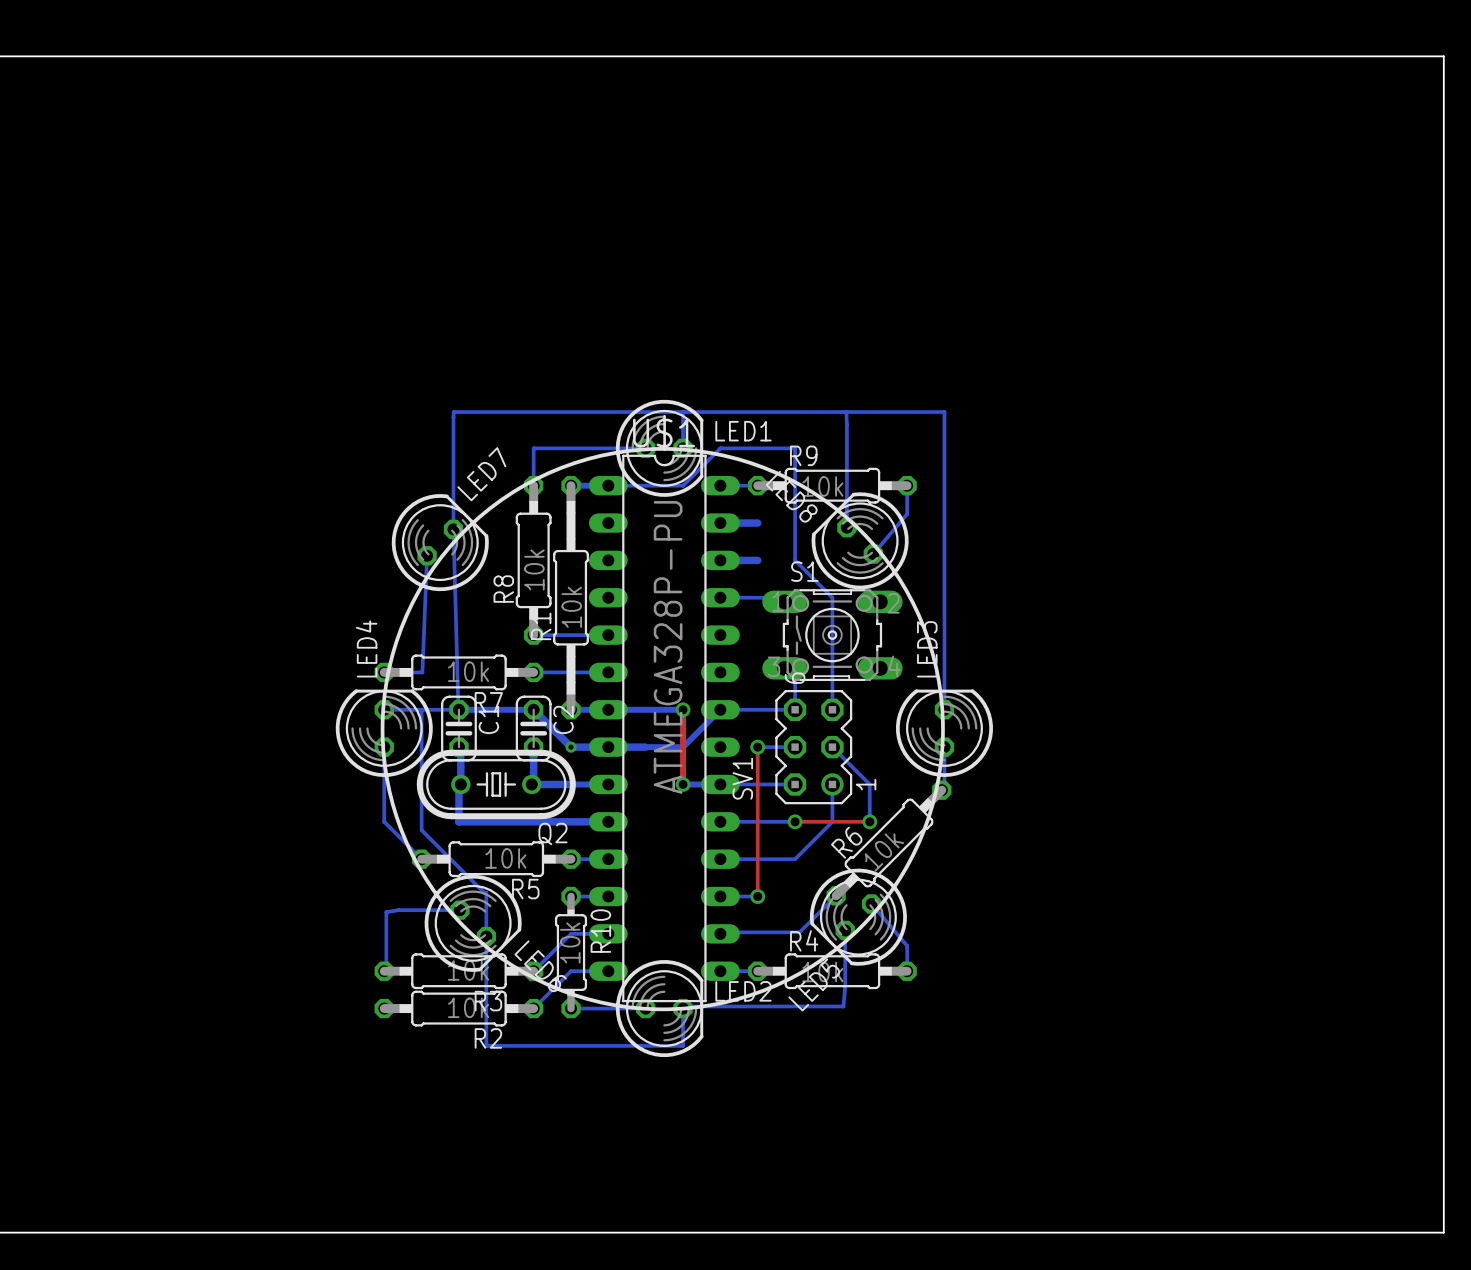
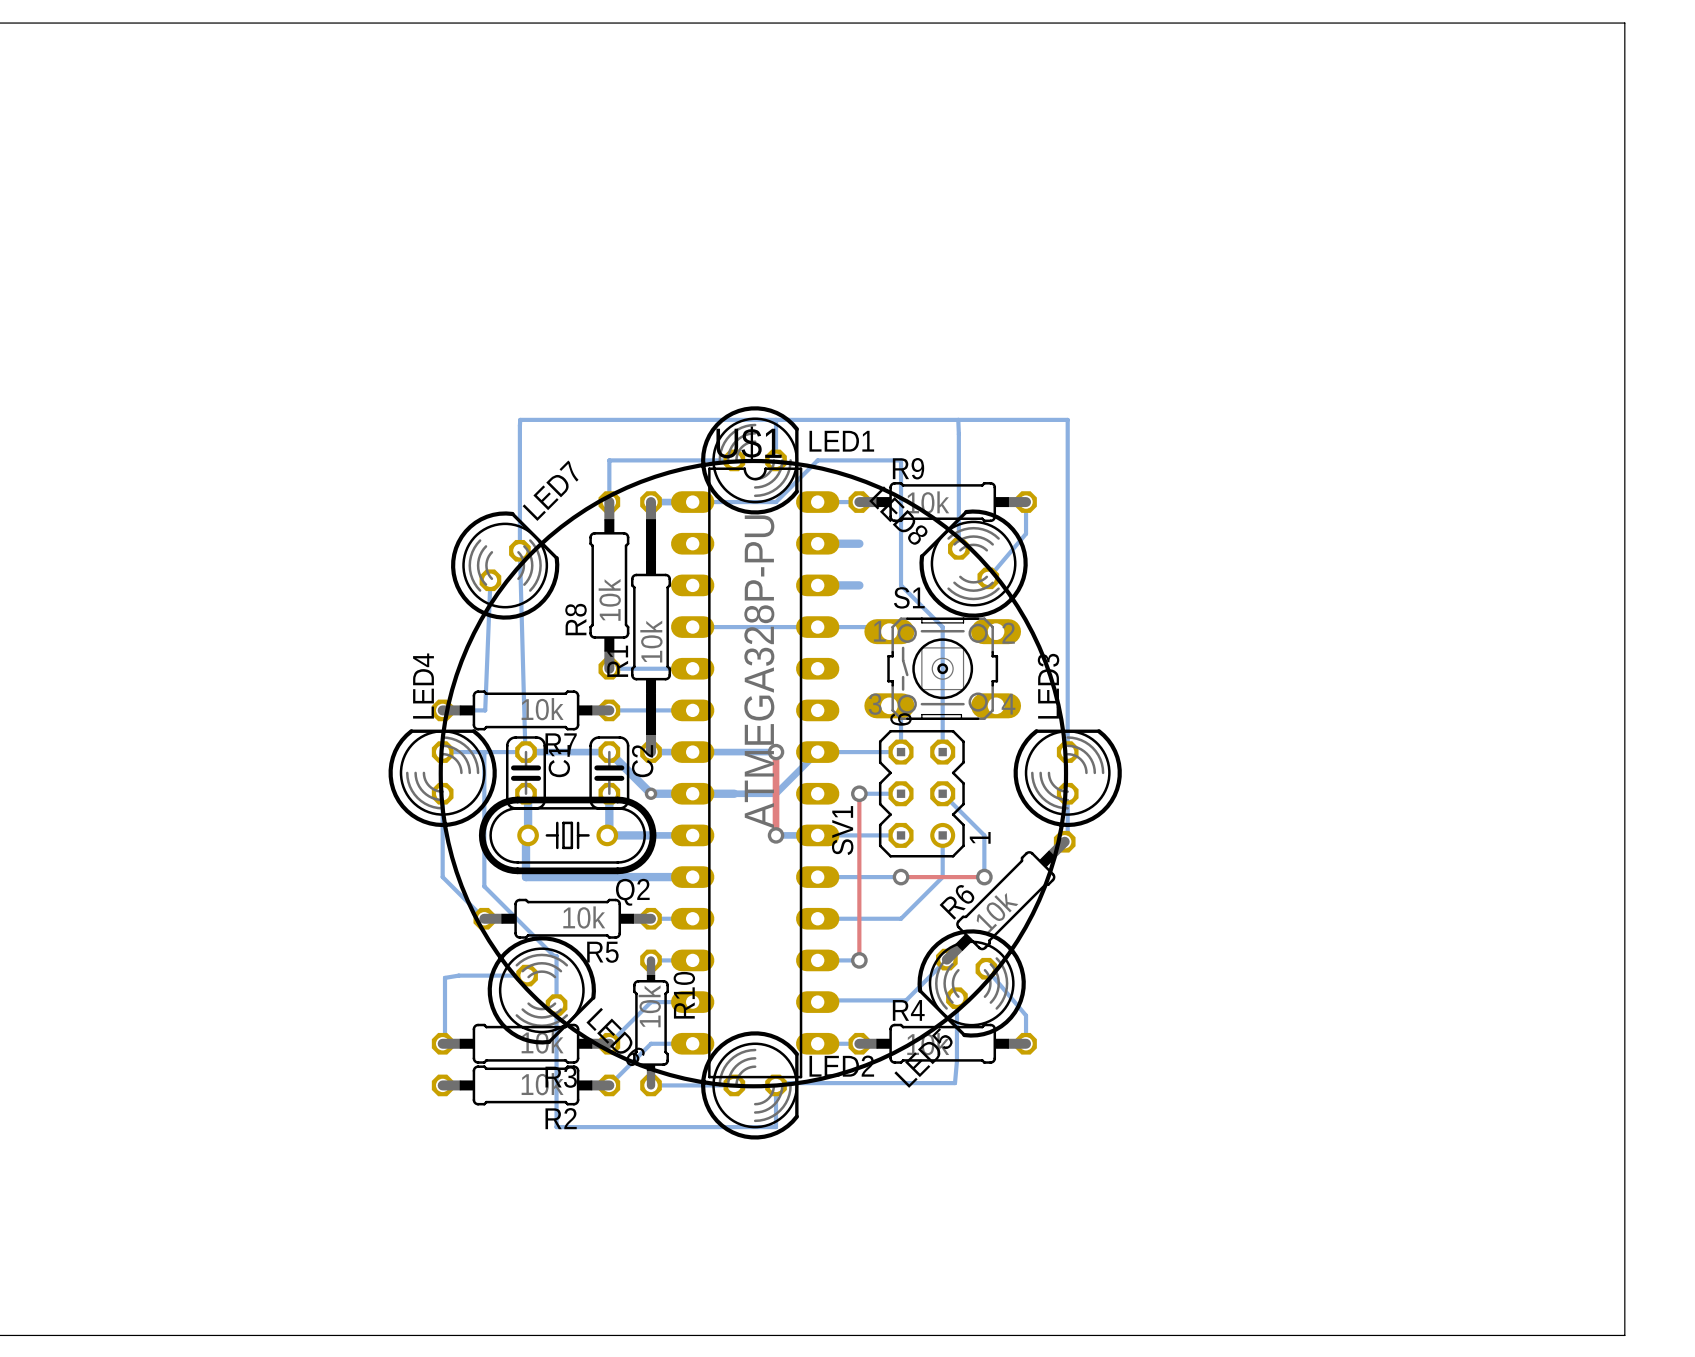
bottom track: none -> (692, 627) (817, 627)

